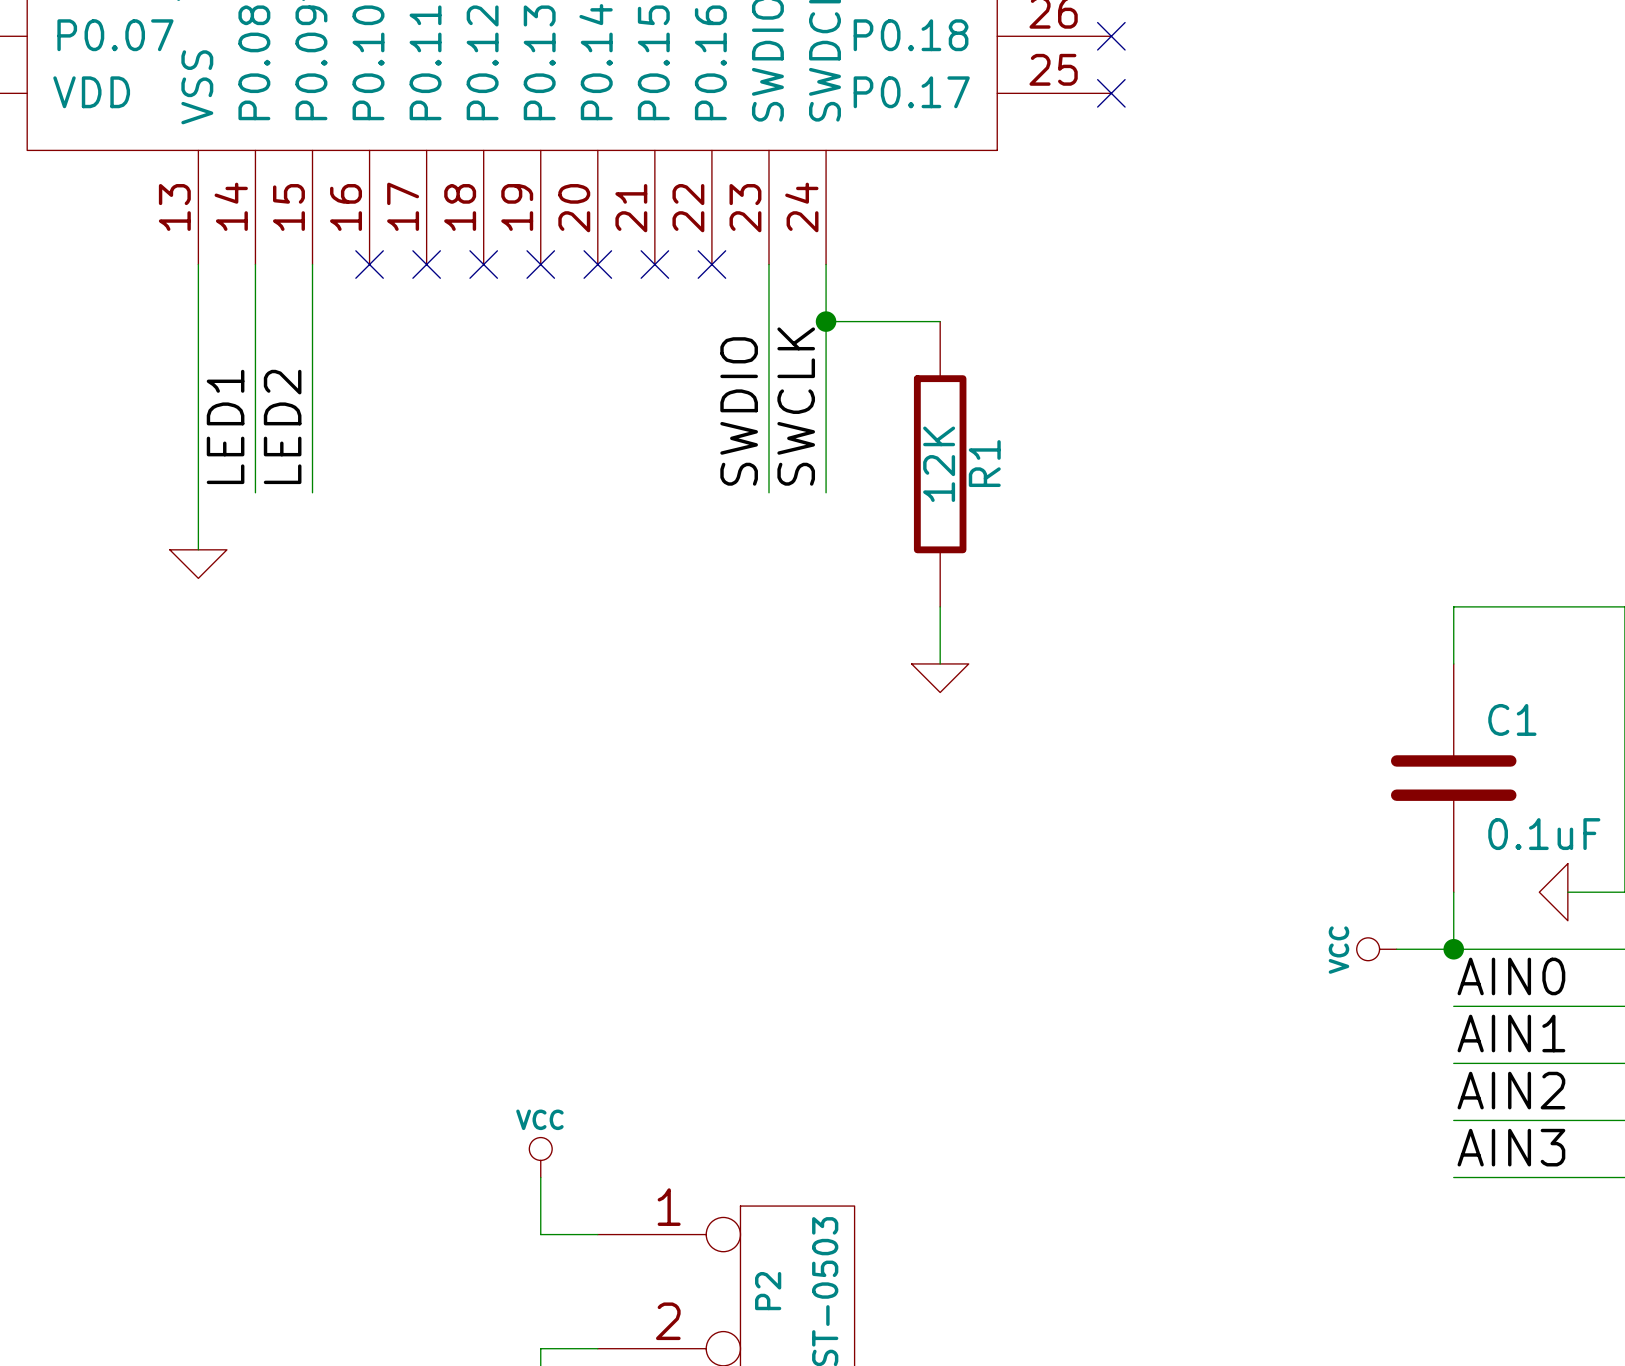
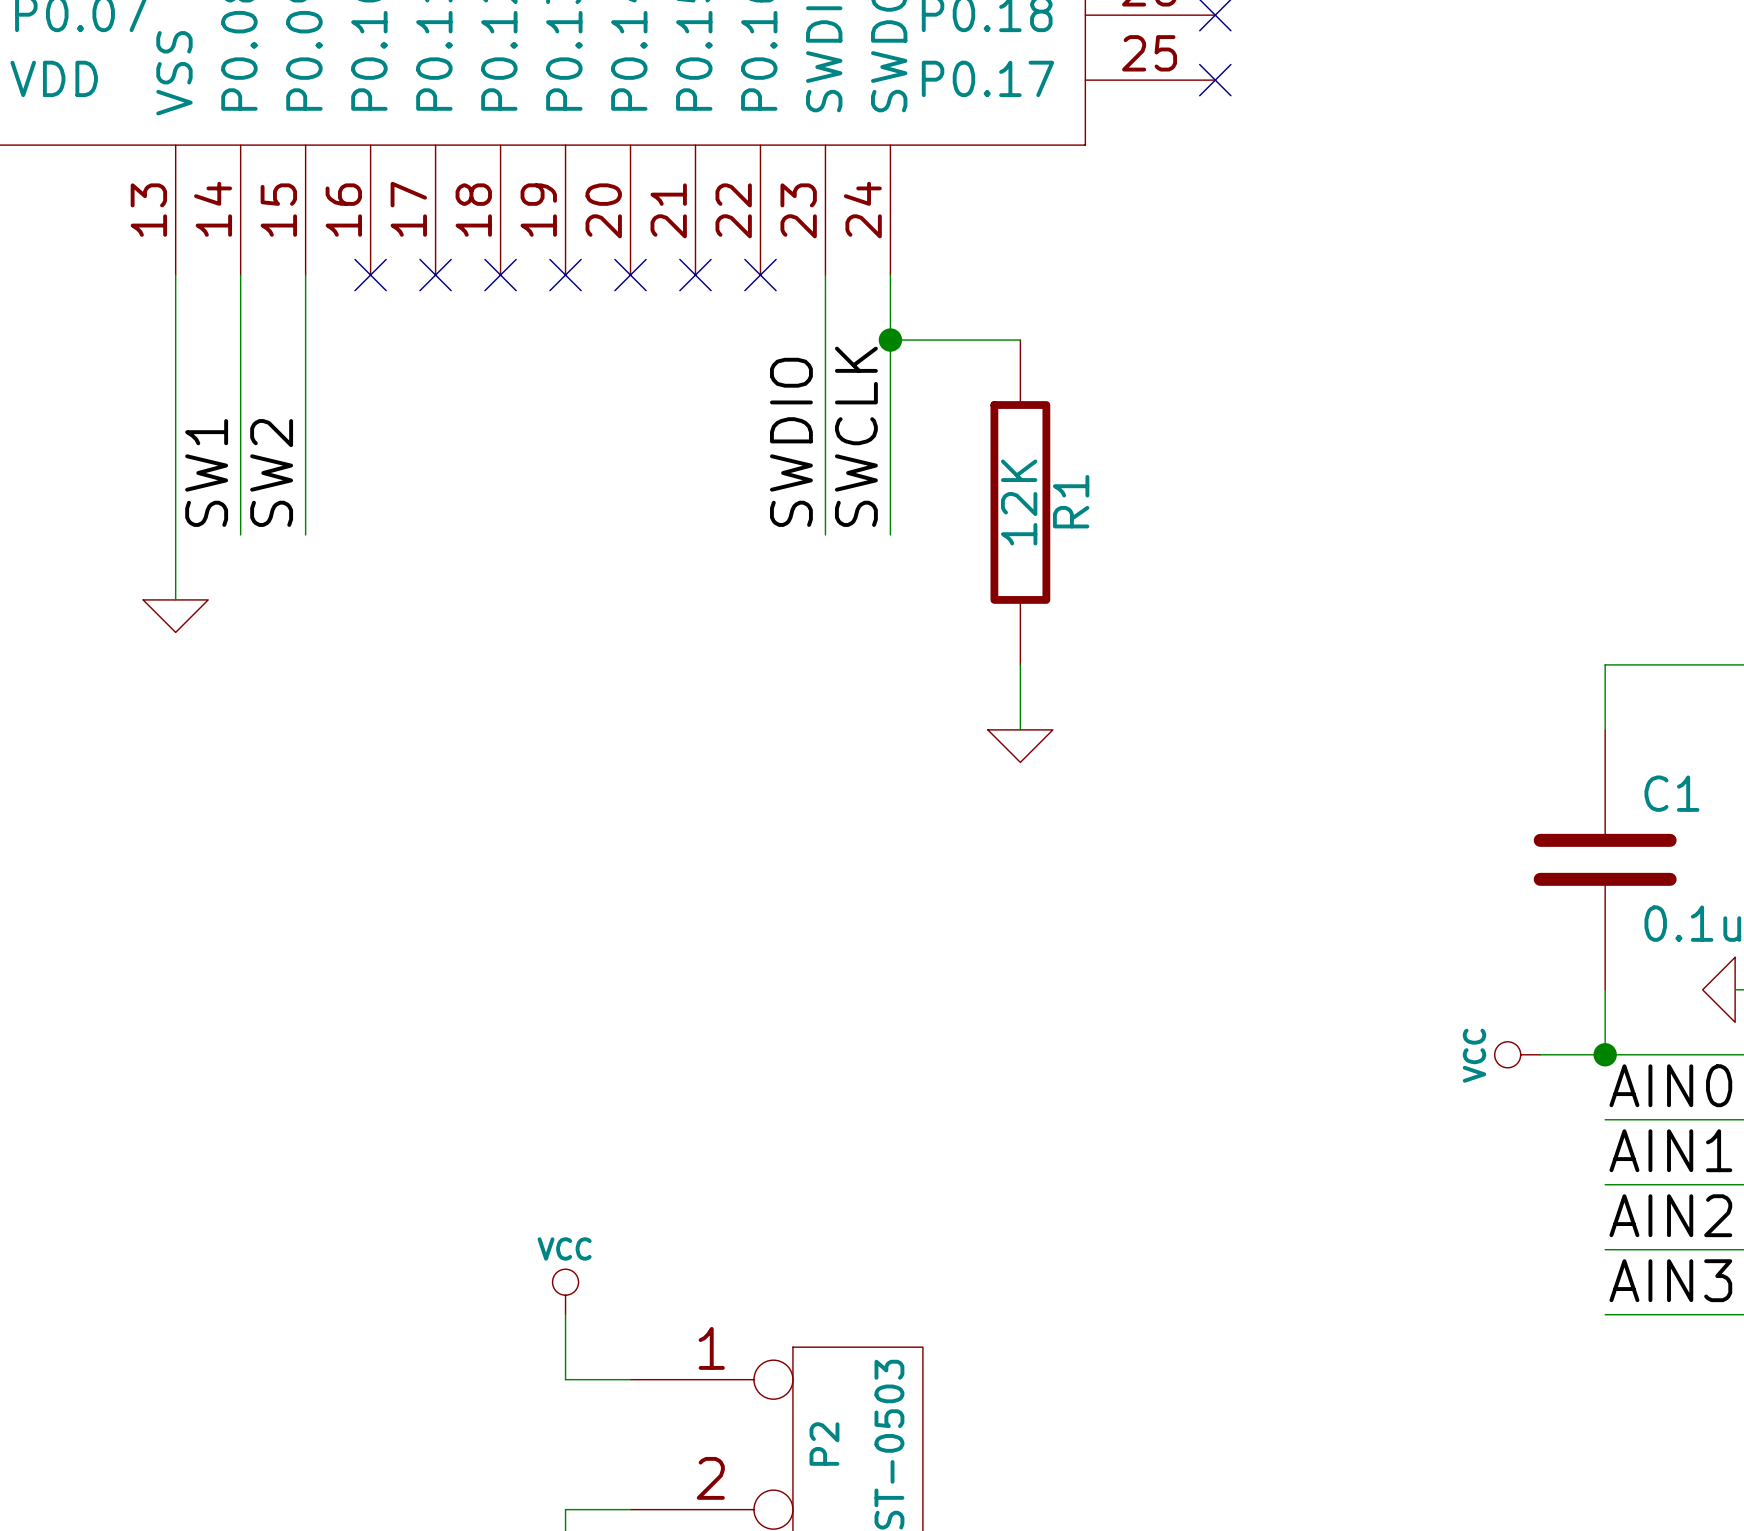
label: LED1 (225, 426) -> SW1 (206, 472)
label: LED2 (282, 426) -> SW2 (271, 472)

